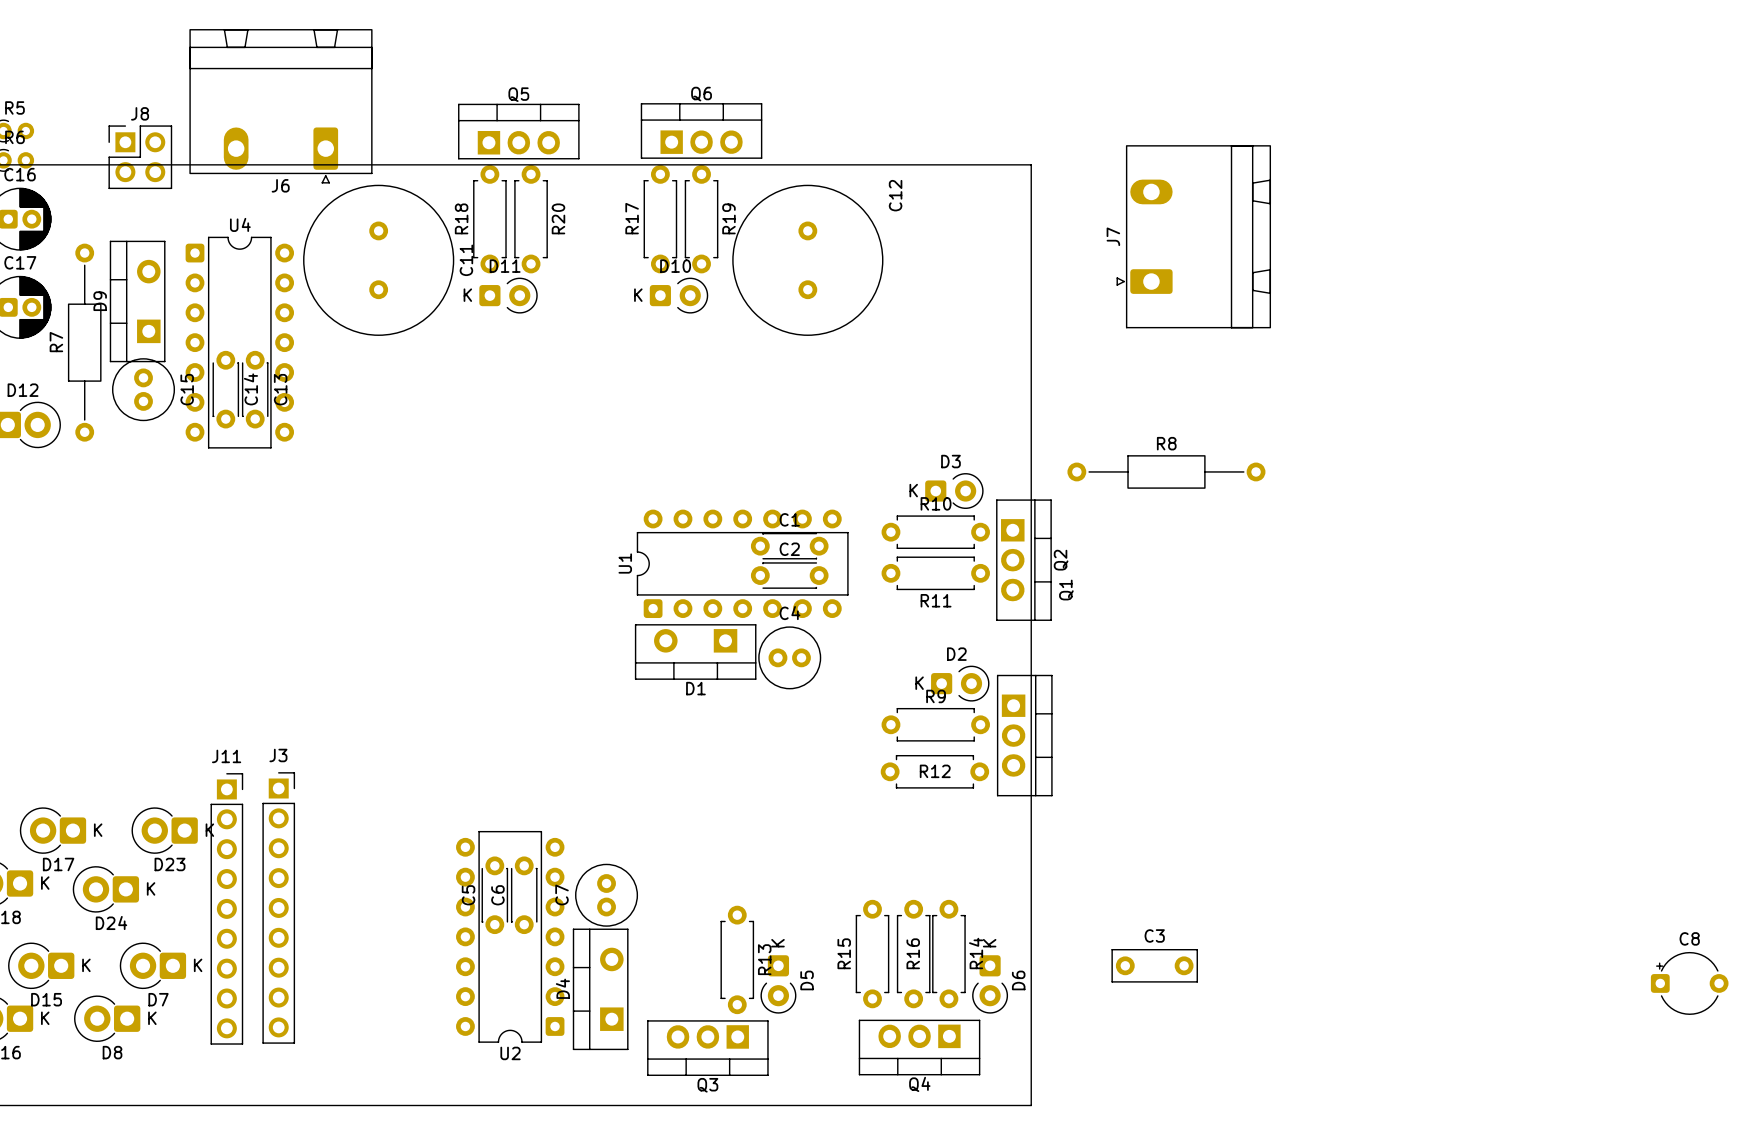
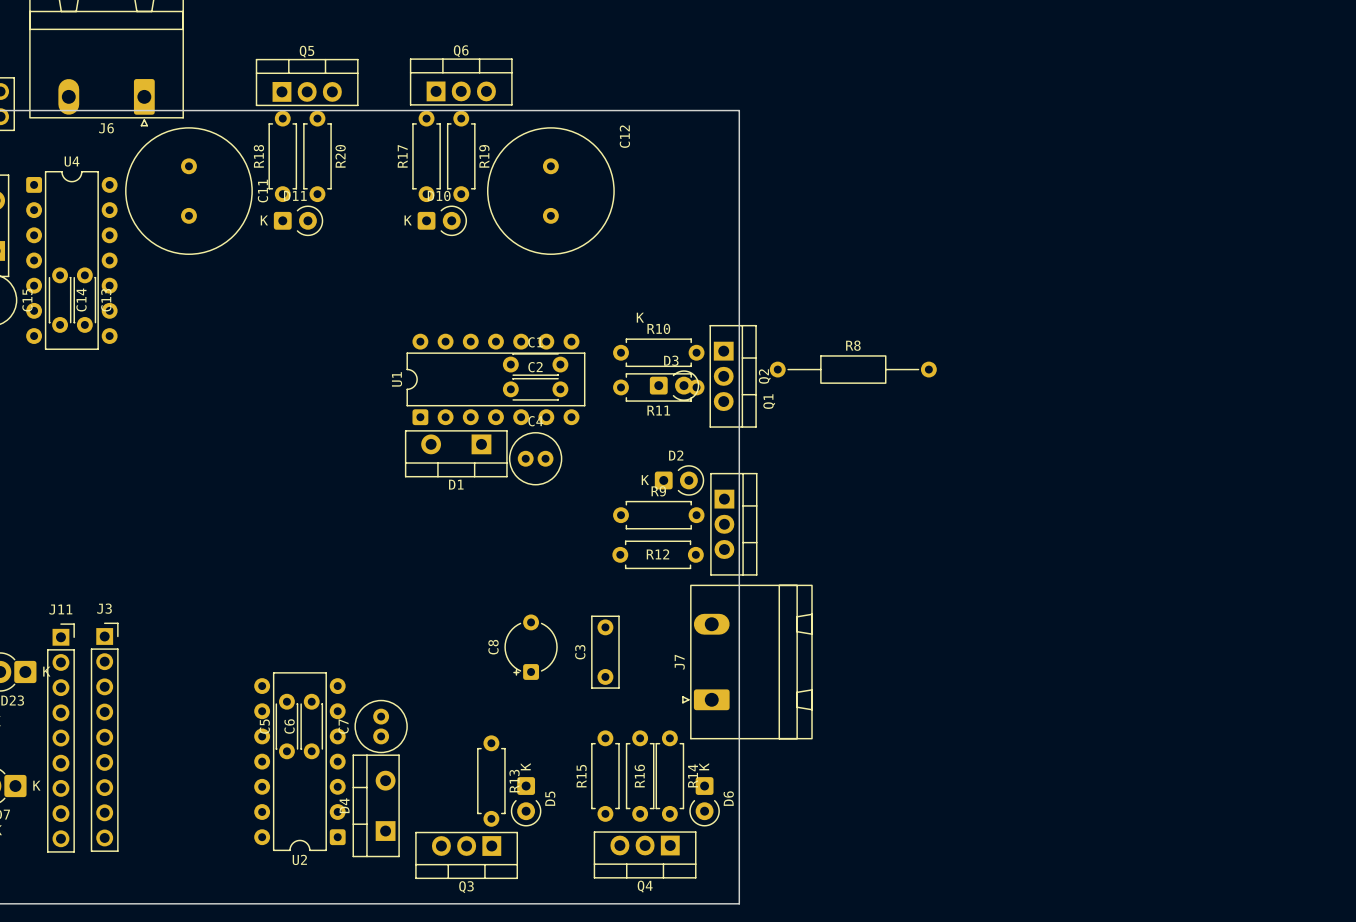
J7 position: (1193, 236) -> (747, 662)
D3 text position: K (913, 490) -> K (640, 317)
R10 position: (935, 532) -> (658, 352)
C1 position: (789, 546) -> (535, 364)
Q2 position: (1023, 560) -> (733, 376)
U1 position: (742, 563) -> (495, 379)
R11 position: (935, 573) -> (658, 387)
C2 position: (789, 575) -> (535, 389)
D1 position: (695, 651) -> (456, 453)
C4 position: (789, 657) -> (535, 458)
D2 position: (960, 683) -> (679, 480)
R9 position: (935, 724) -> (658, 515)
Q1 position: (1024, 735) -> (733, 524)
R12 position: (934, 771) -> (658, 554)
C3 name position: C3 (1154, 935) -> C3 (580, 652)
C3 rotation: 0° (1154, 965) -> 90° clockwise (605, 652)
C3 position: (1154, 965) -> (605, 652)
C8 rotation: 0° (1689, 983) -> 90° counterclockwise (531, 647)
C8 position: (1689, 983) -> (531, 647)

